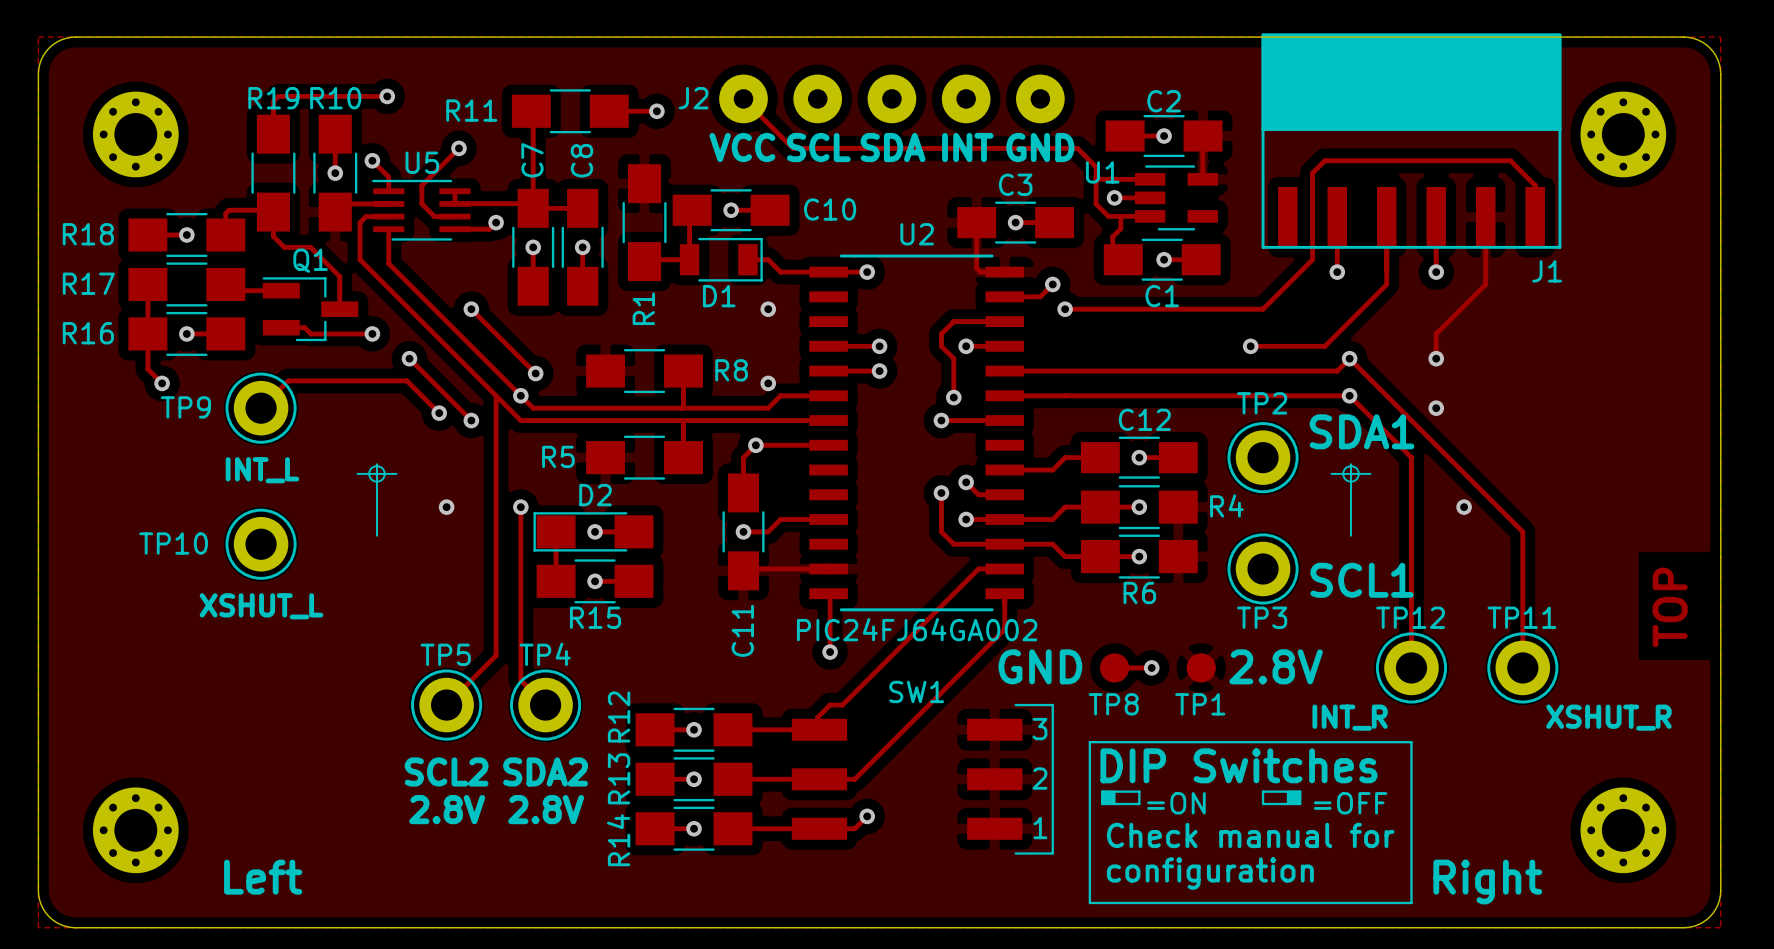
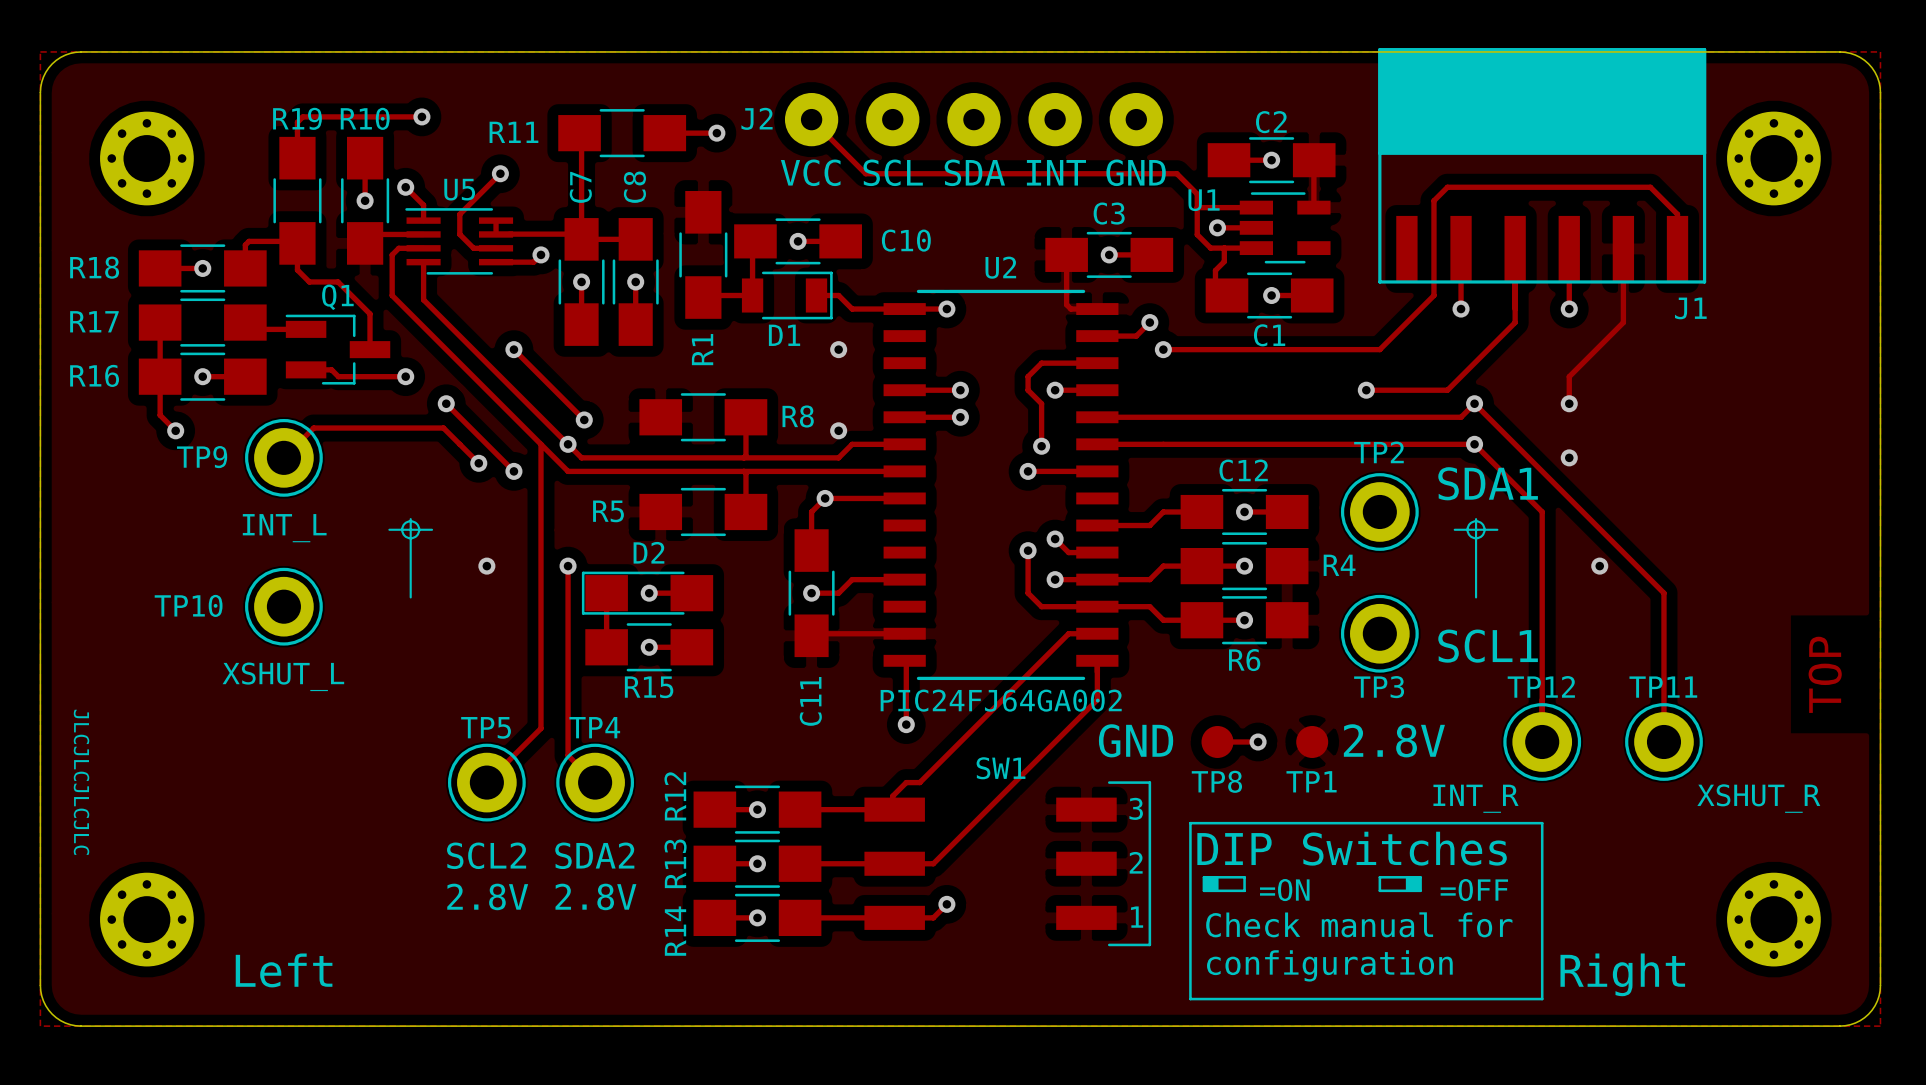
text: none -> JLCJLCJLCJLC (81, 782)

